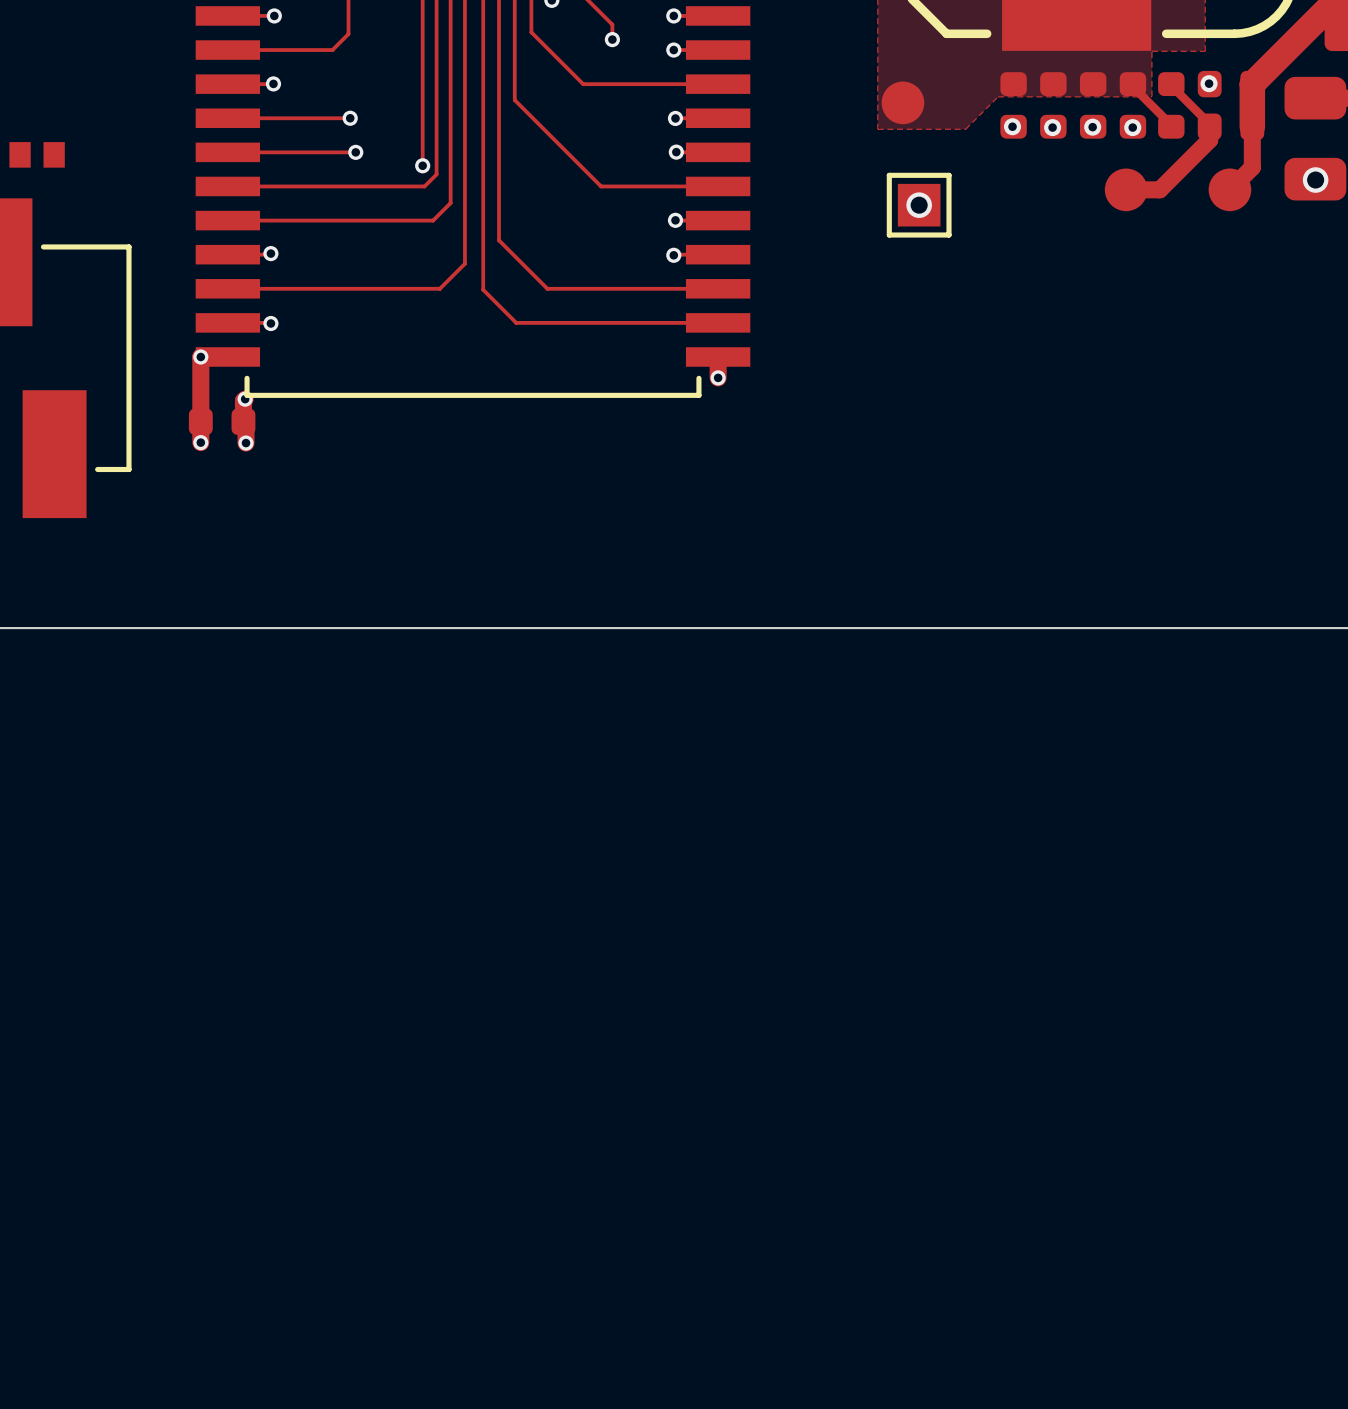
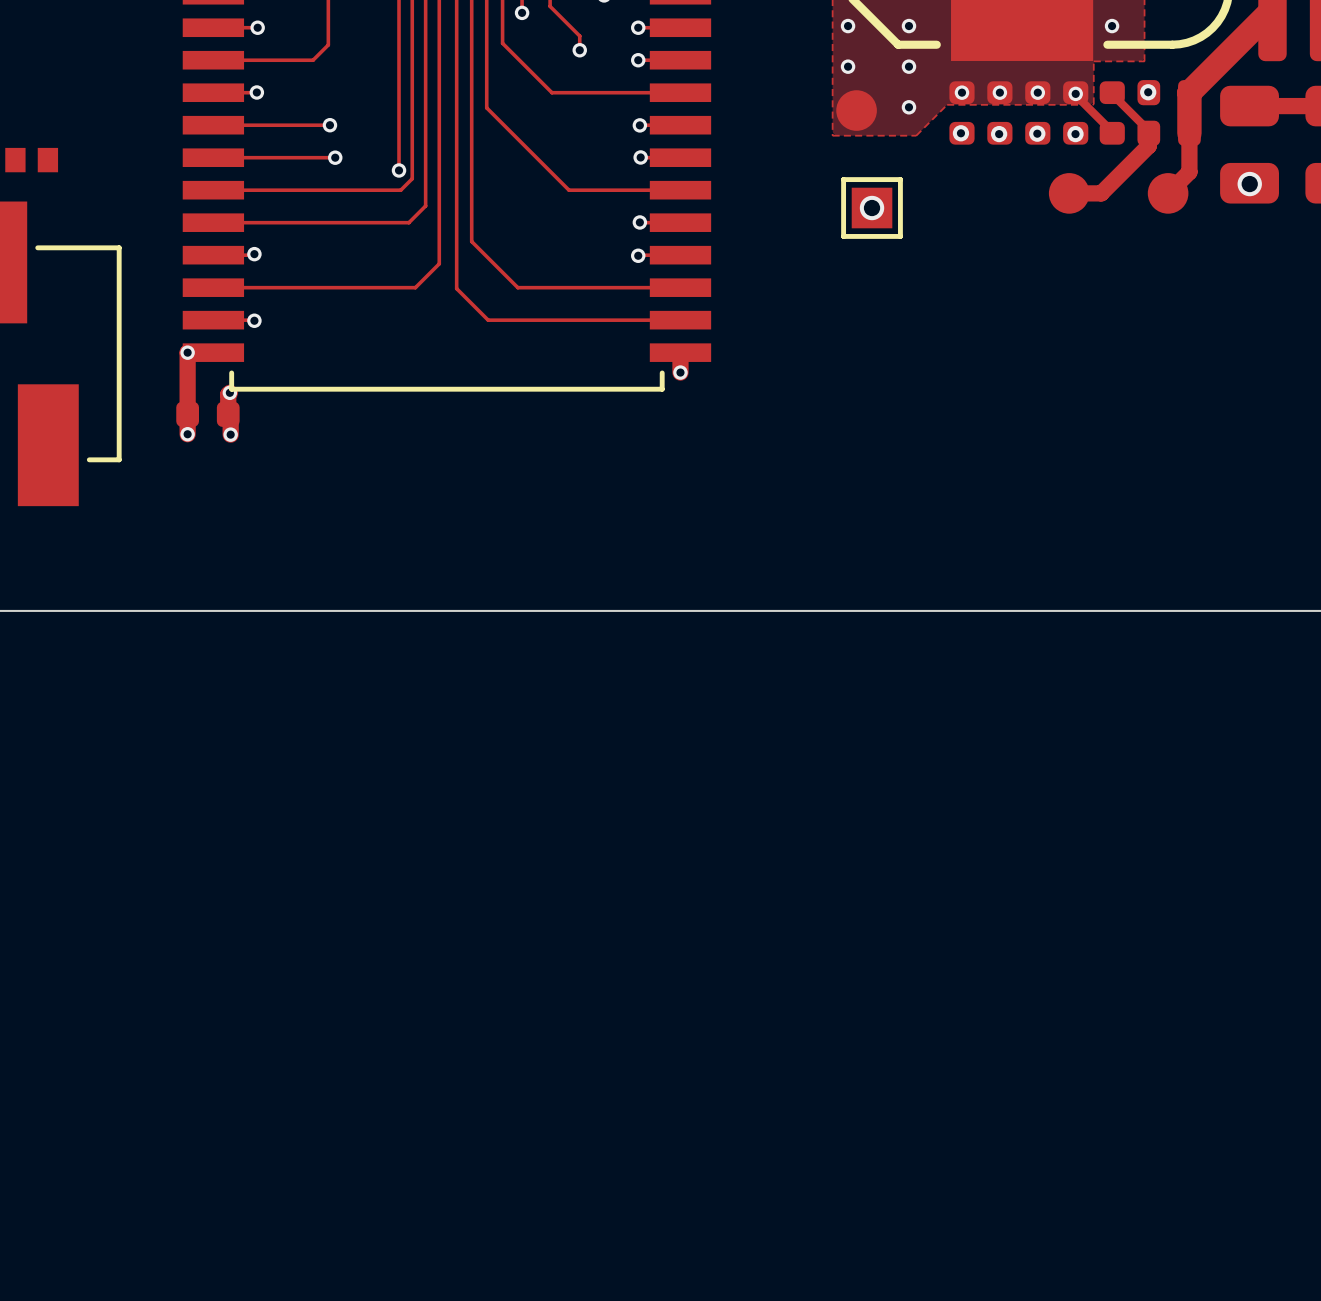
via: none -> (848, 26)
via: none -> (908, 26)
via: none -> (1112, 26)
via: none -> (848, 66)
via: none -> (908, 66)
via: none -> (961, 92)
via: none -> (999, 92)
via: none -> (1037, 92)
via: none -> (1075, 93)
via: none -> (908, 107)

